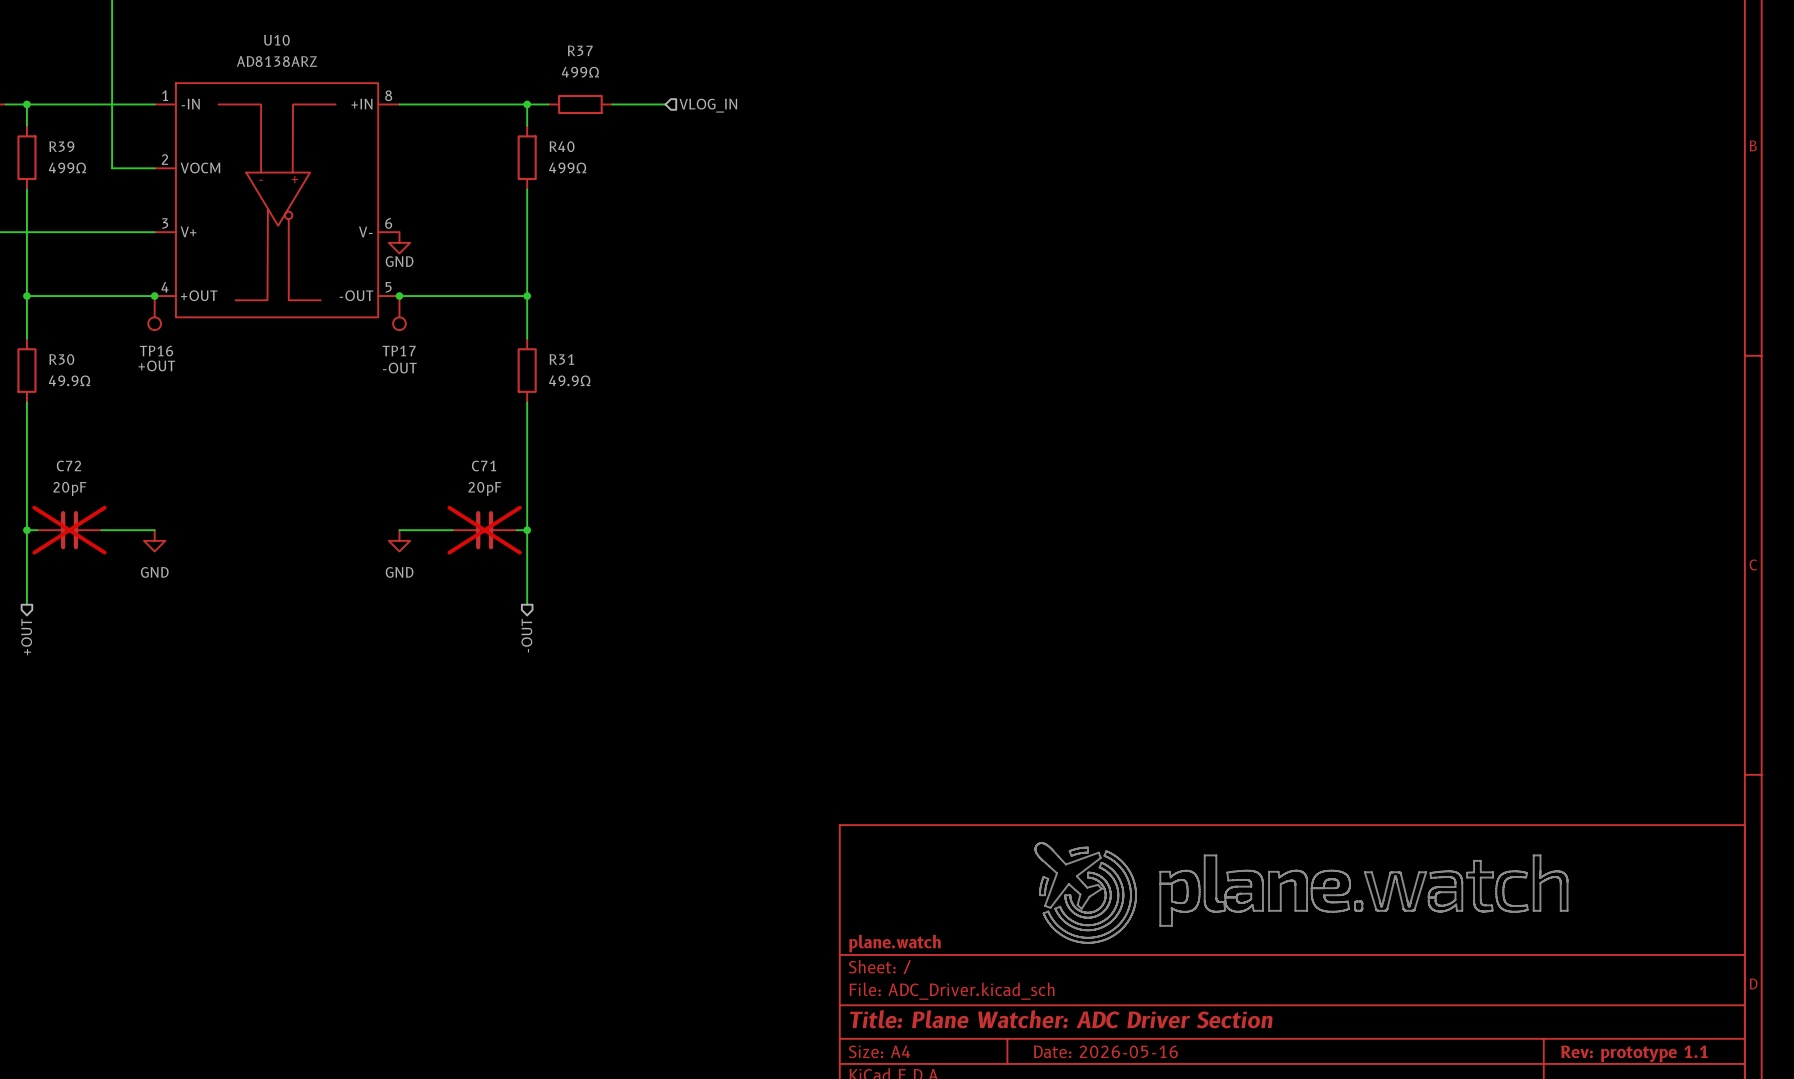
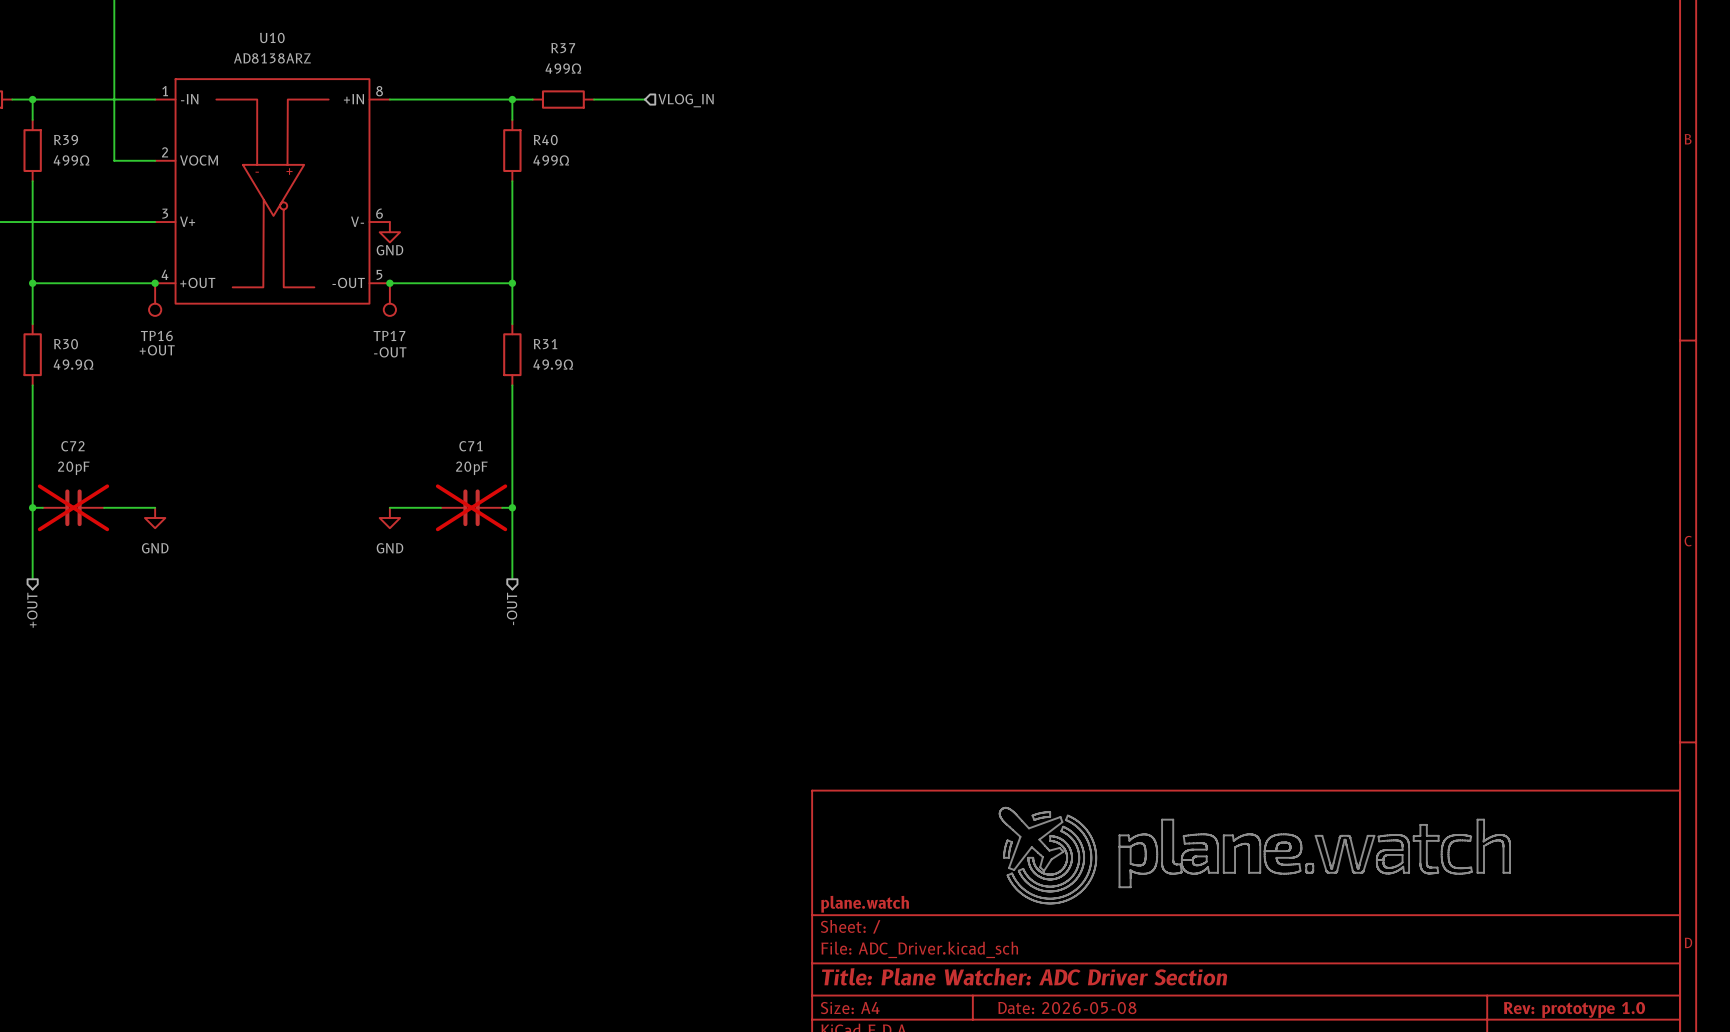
title block: Date: 2026-05-16 (1105, 1051) -> Date: 2026-05-08 (1067, 1008)
title block: Rev: prototype 1.1 (1634, 1053) -> Rev: prototype 1.0 (1574, 1009)

